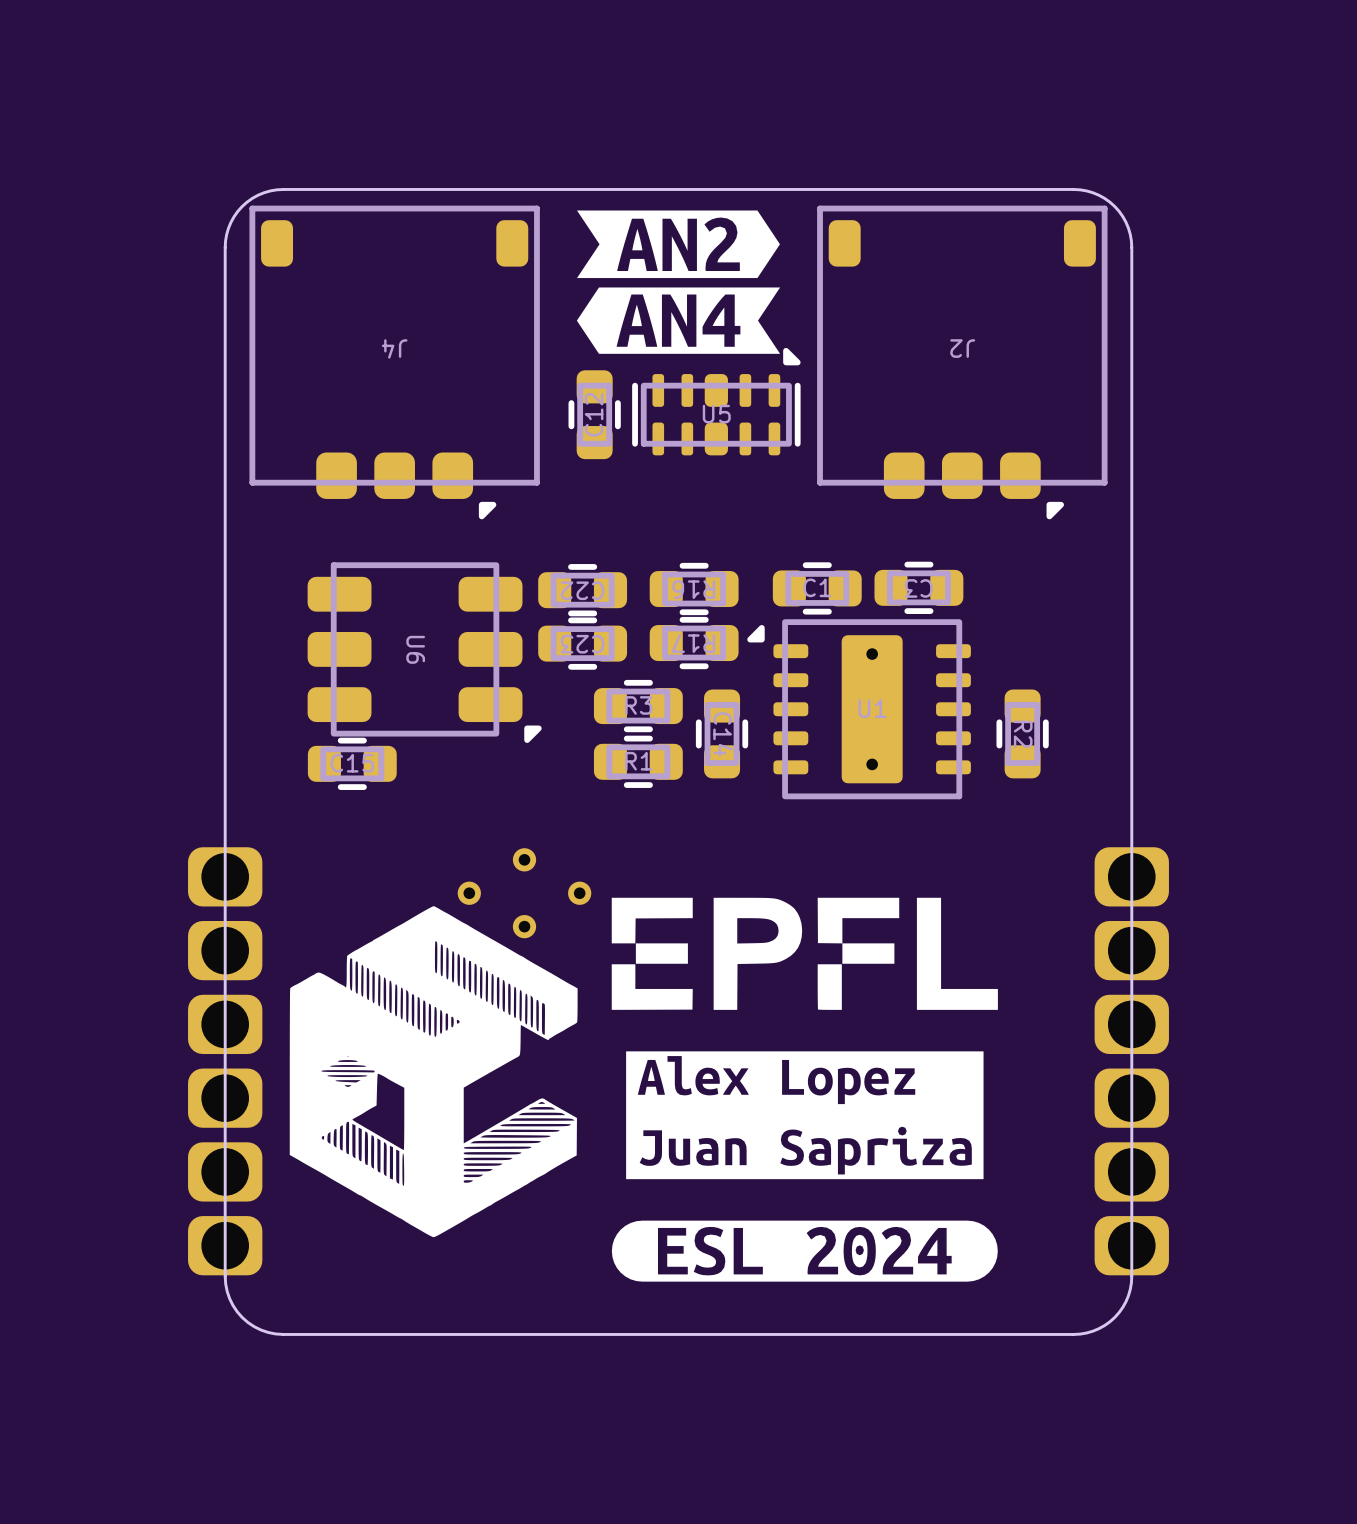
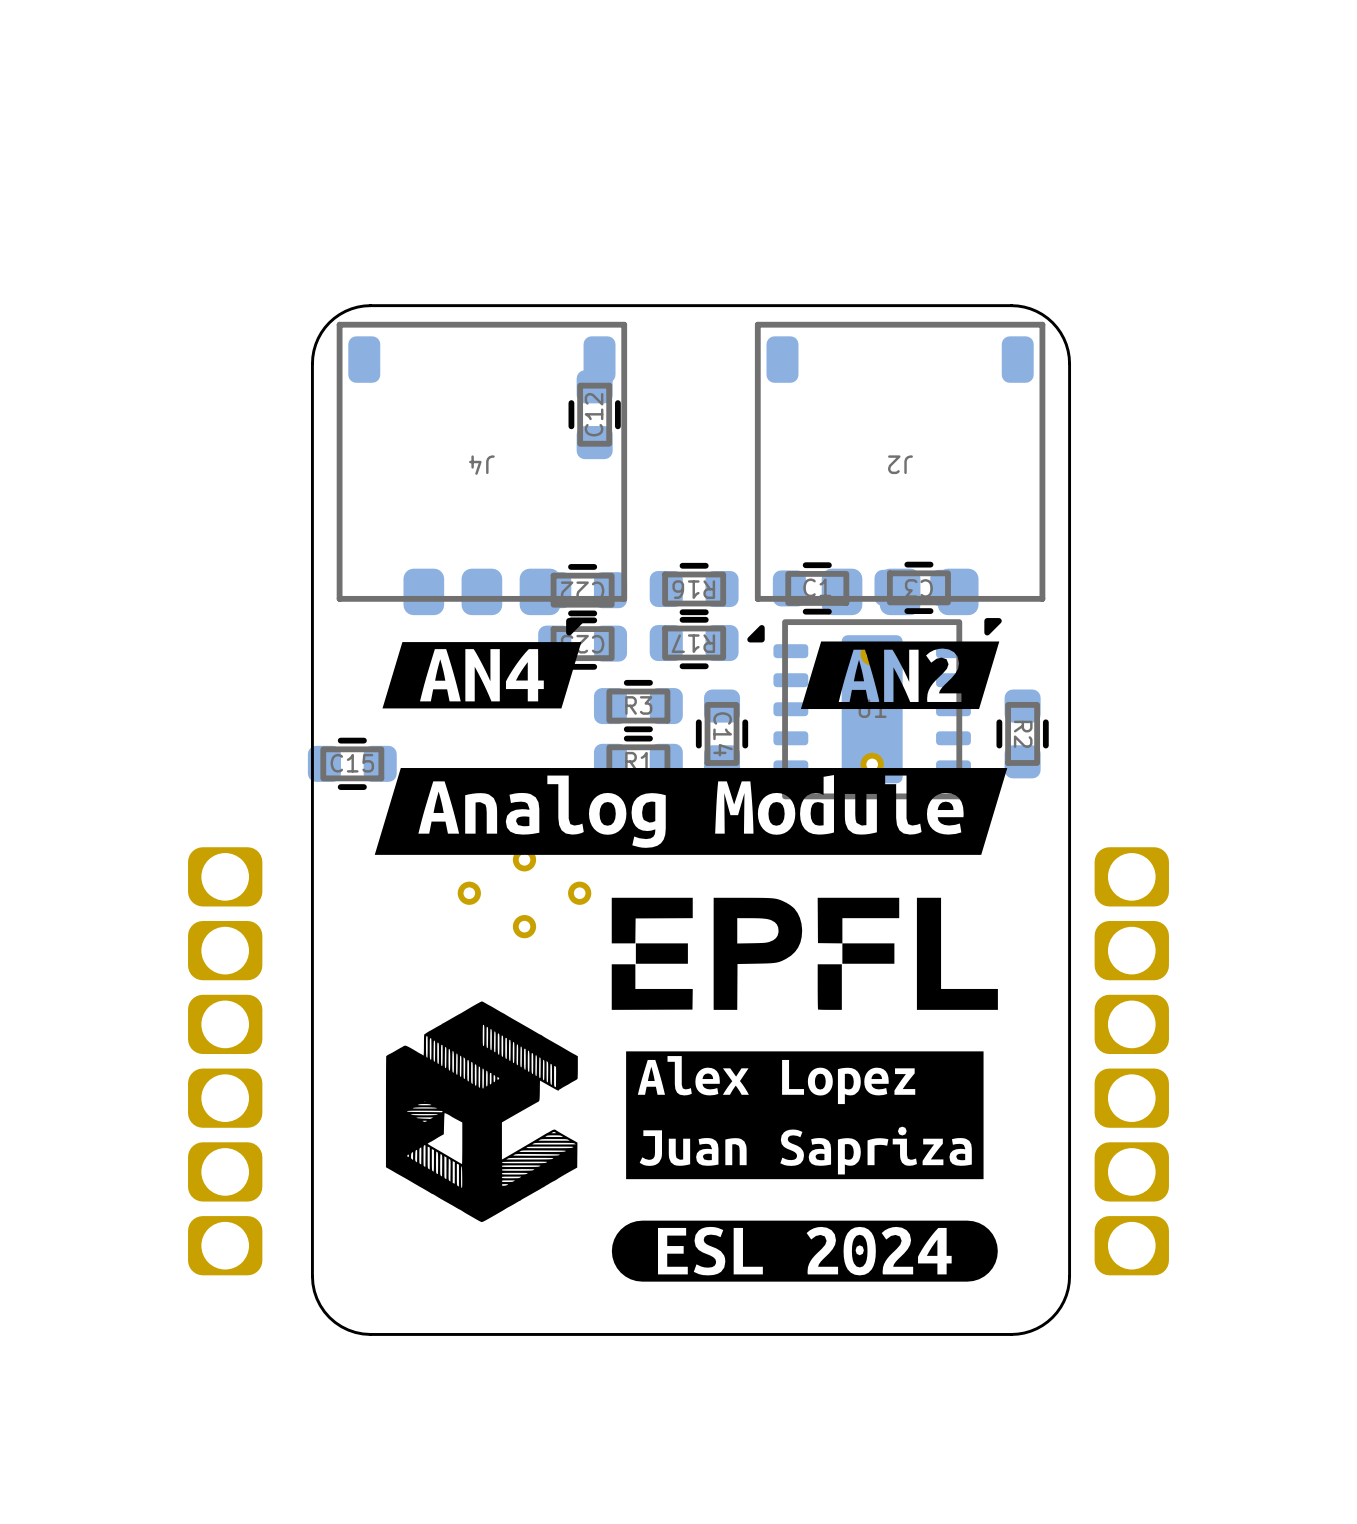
drawing: [576, 210, 781, 354] -> none
J4 position: (394, 362) -> (481, 478)
J2 position: (962, 362) -> (900, 478)
U5: (716, 401) -> none
drawing: none -> [374, 641, 1008, 855]
U6: (424, 652) -> none
drawing: [289, 906, 578, 1238] -> none
drawing: none -> [385, 1001, 578, 1223]
board edge: (1011, 1334) (1080, 1334) (1098, 1328) (1114, 1317) (1122, 1307) (1131, 1282) (1131, 247) (1128, 228) (1122, 216) (1104, 198) (1092, 192) (1073, 189) (276, 189) (258, 195) (237, 211) (228, 228) (225, 247) (225, 1283) (229, 1298) (237, 1311) (247, 1322) (261, 1330) (283, 1334) (370, 1334) -> (1011, 1334) (1030, 1331) (1052, 1317) (1063, 1301) (1069, 1276) (1069, 357) (1063, 338) (1052, 322) (1036, 311) (1011, 305) (370, 305) (357, 307) (339, 314) (321, 332) (315, 344) (312, 363) (312, 1276) (316, 1298) (329, 1317) (348, 1330) (370, 1334)

